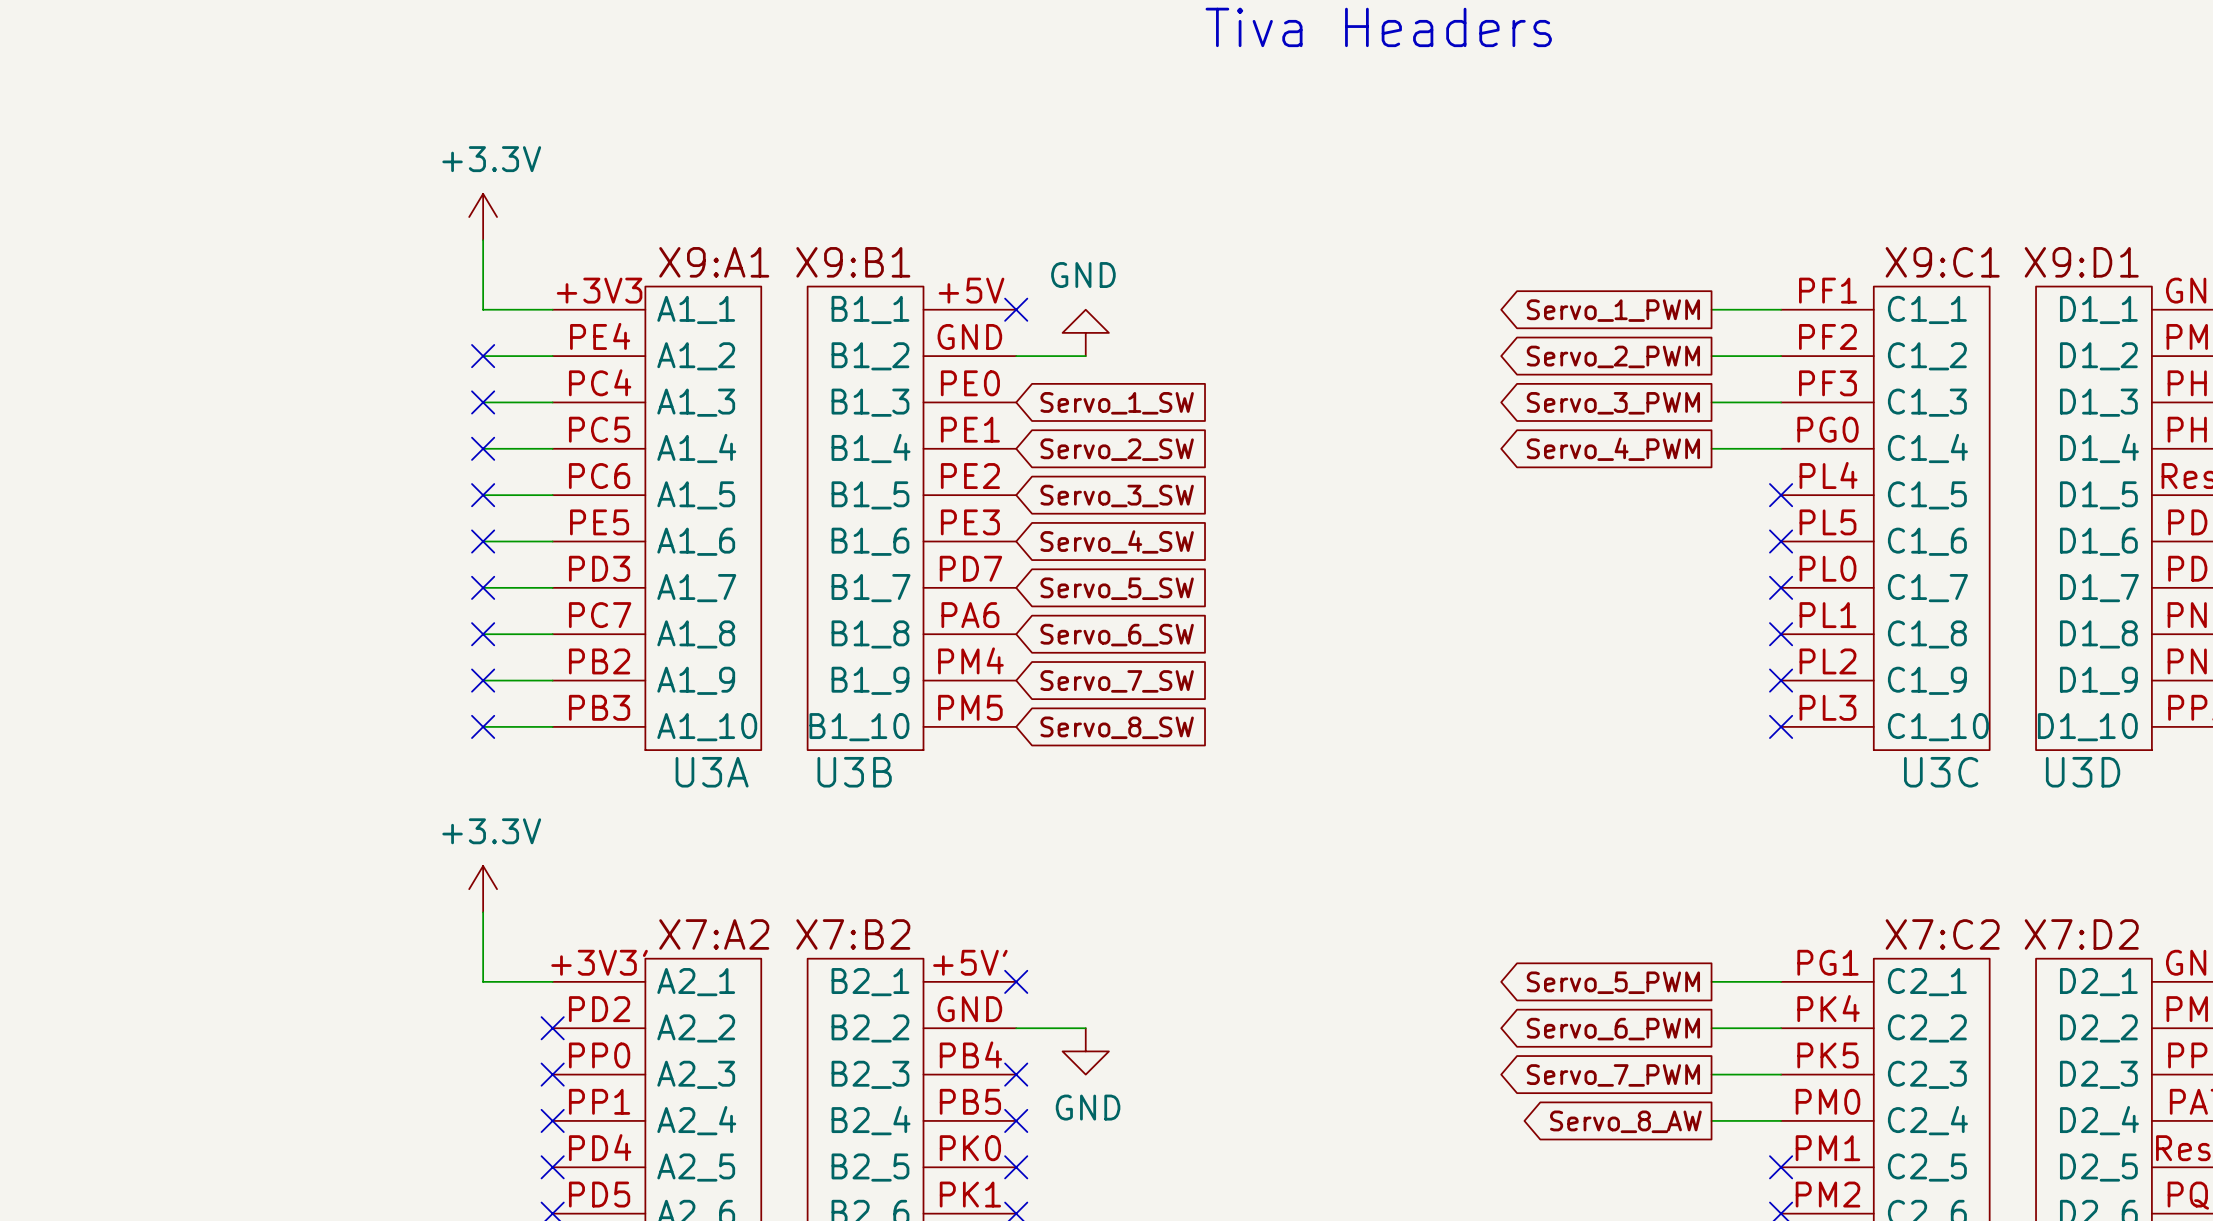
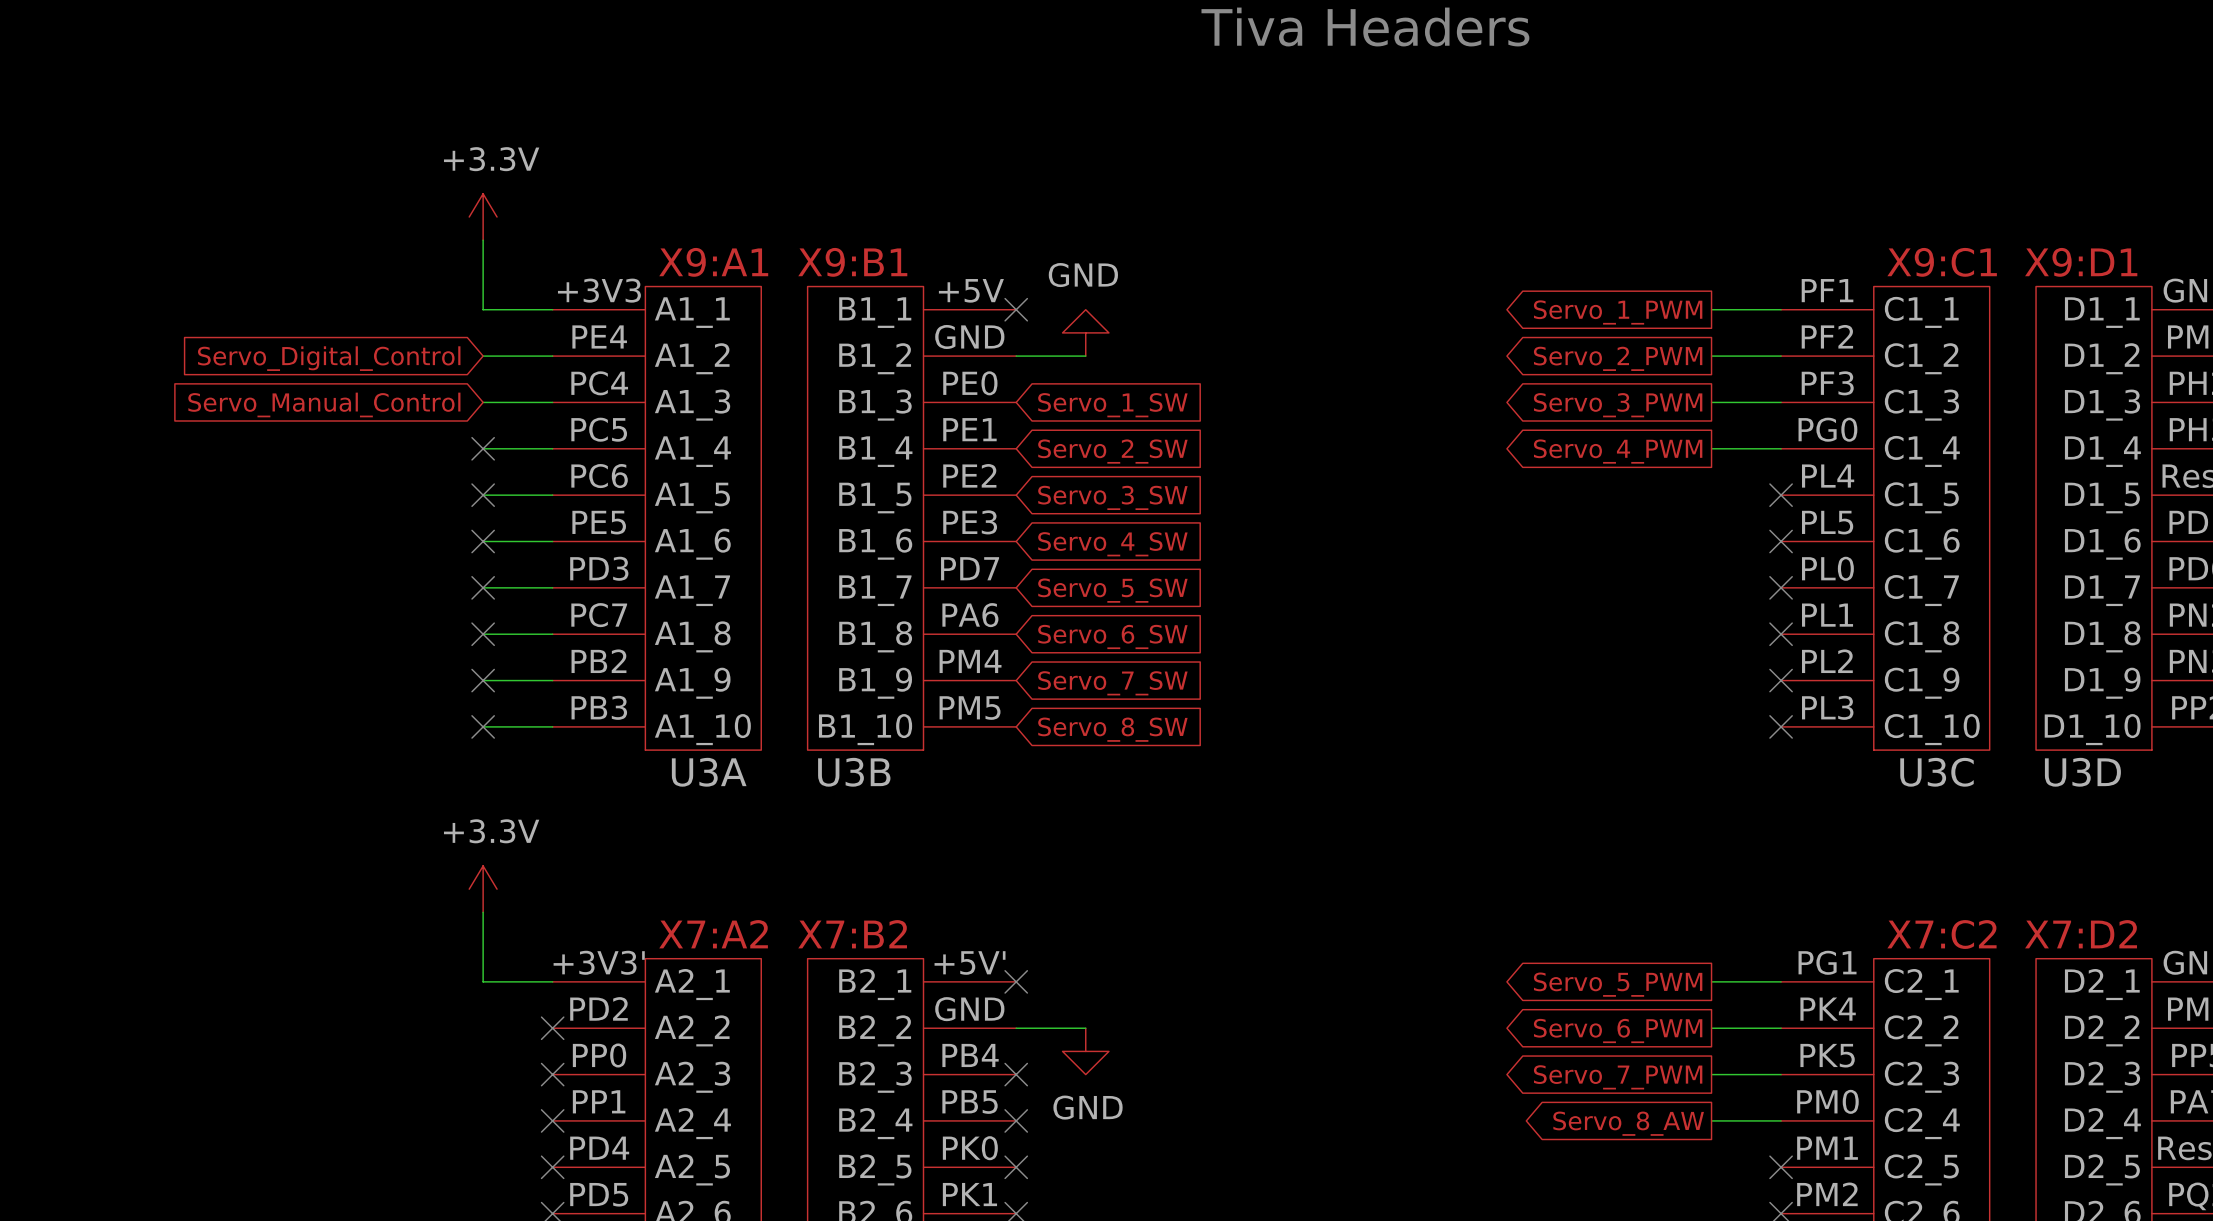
no-connect mark: (483, 356) -> none
global label: none -> Servo_Digital_Control (329, 358)
no-connect mark: (483, 402) -> none
global label: none -> Servo_Manual_Control (324, 404)

